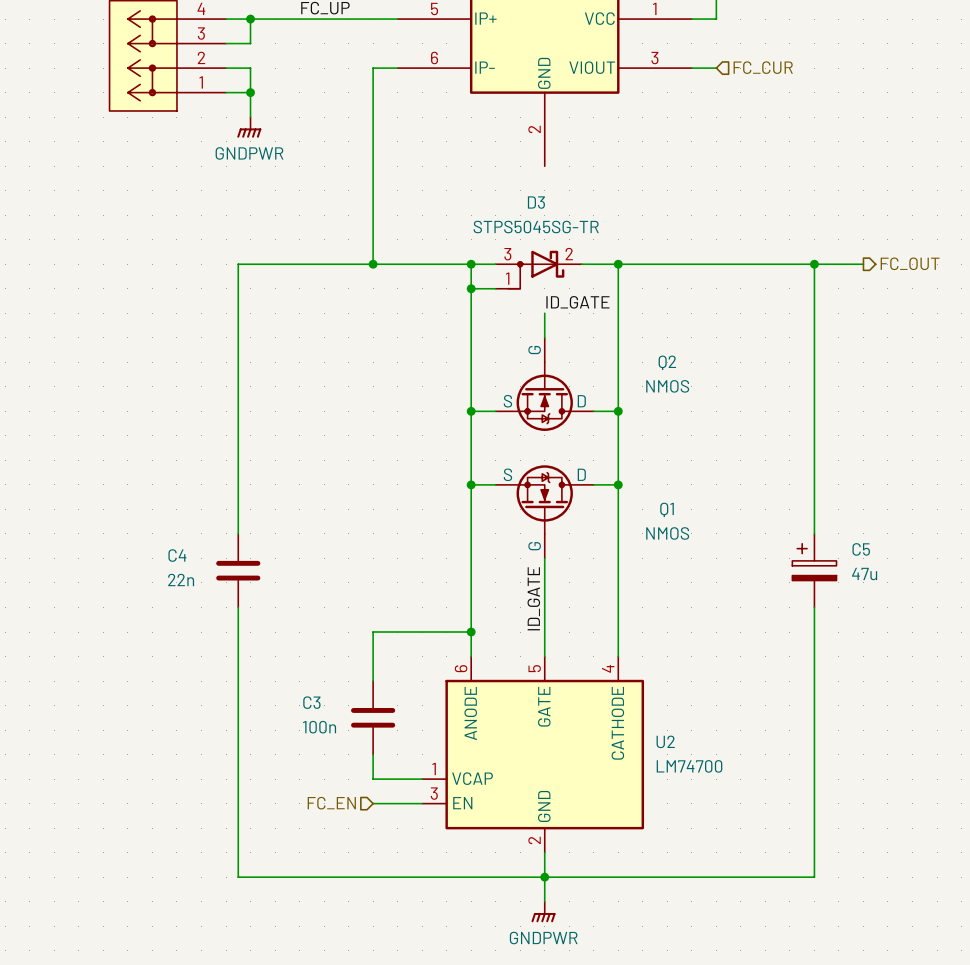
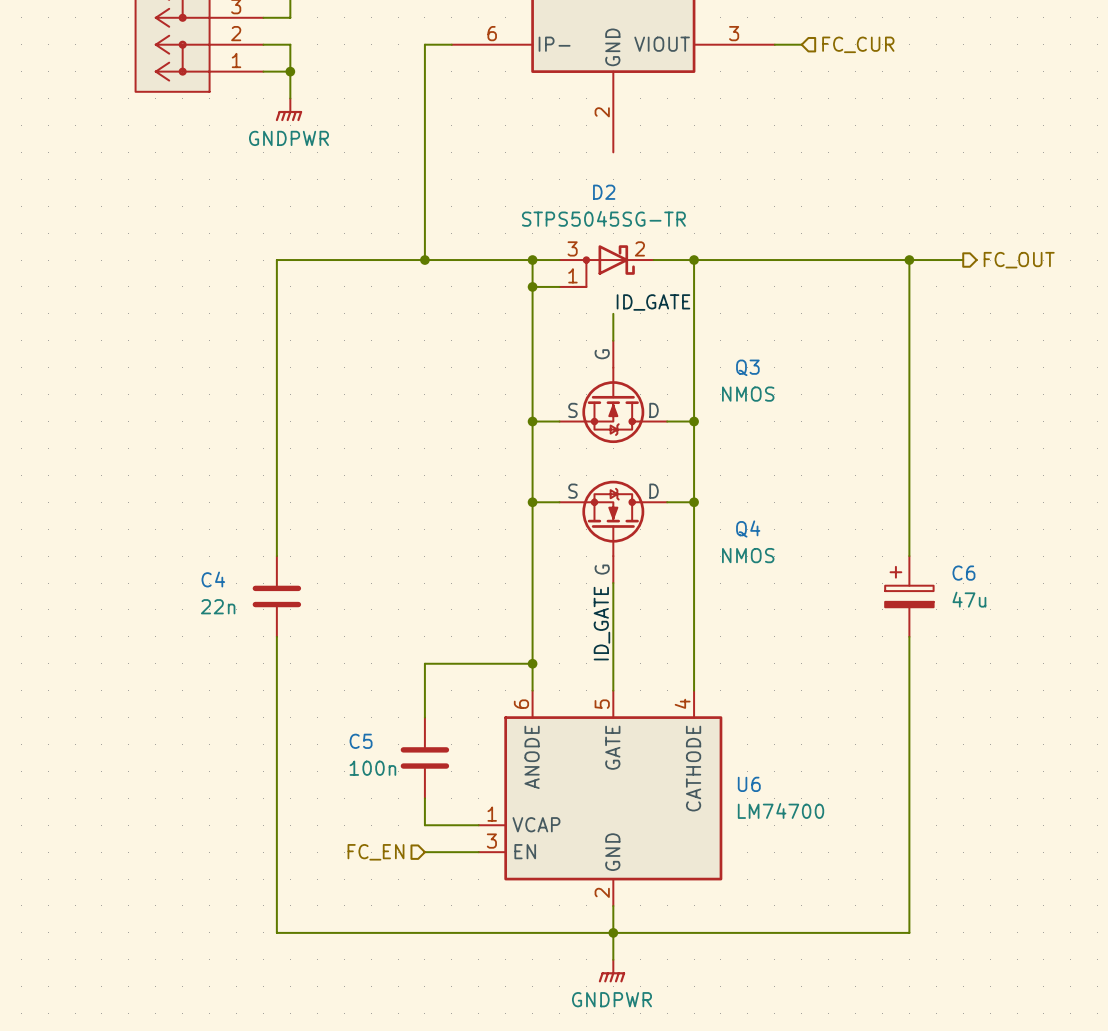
D3 name: D3 (536, 202) -> D2 (604, 192)
Q2 name: Q2 (667, 362) -> Q3 (747, 367)
Q1 name: Q1 (667, 509) -> Q4 (748, 529)
C5 name: C5 (861, 549) -> C6 (963, 573)
C3 name: C3 (311, 702) -> C5 (361, 741)
U2 name: U2 (665, 741) -> U6 (749, 784)

